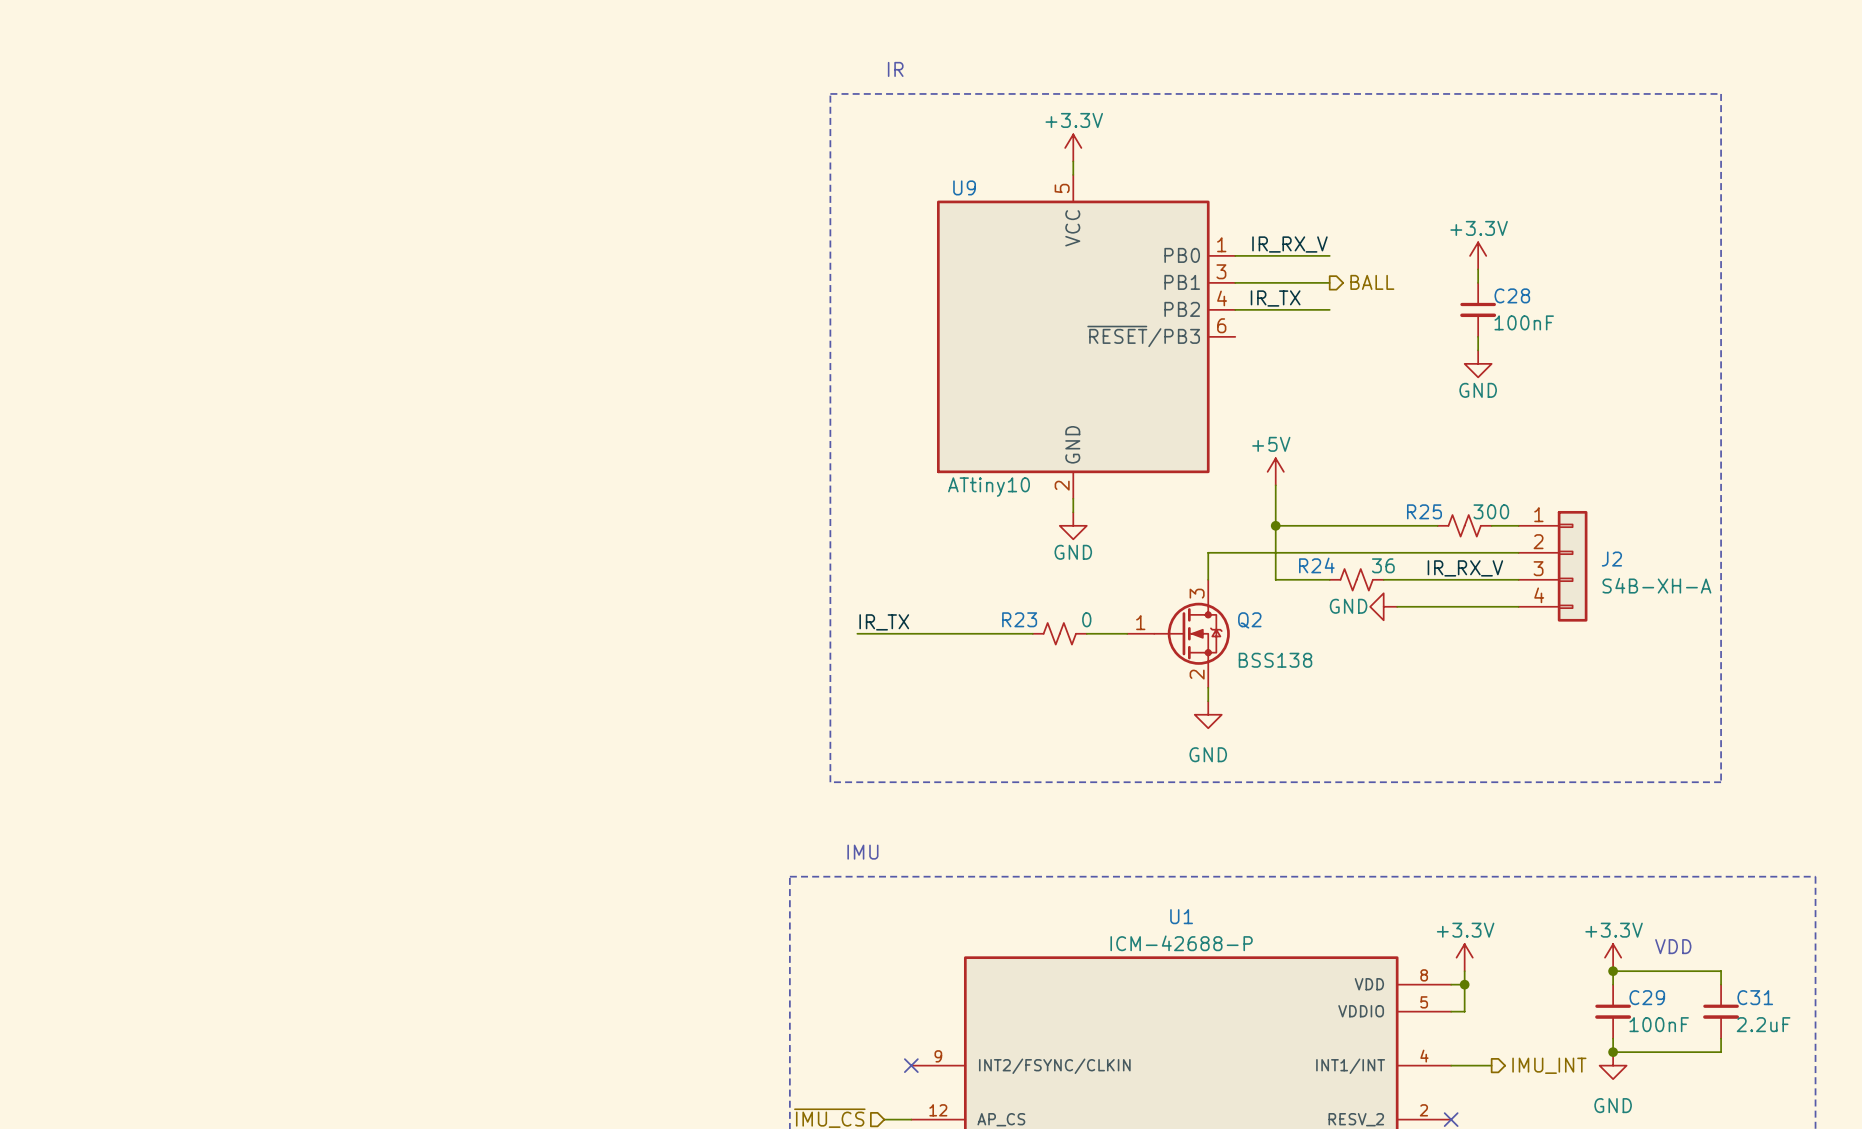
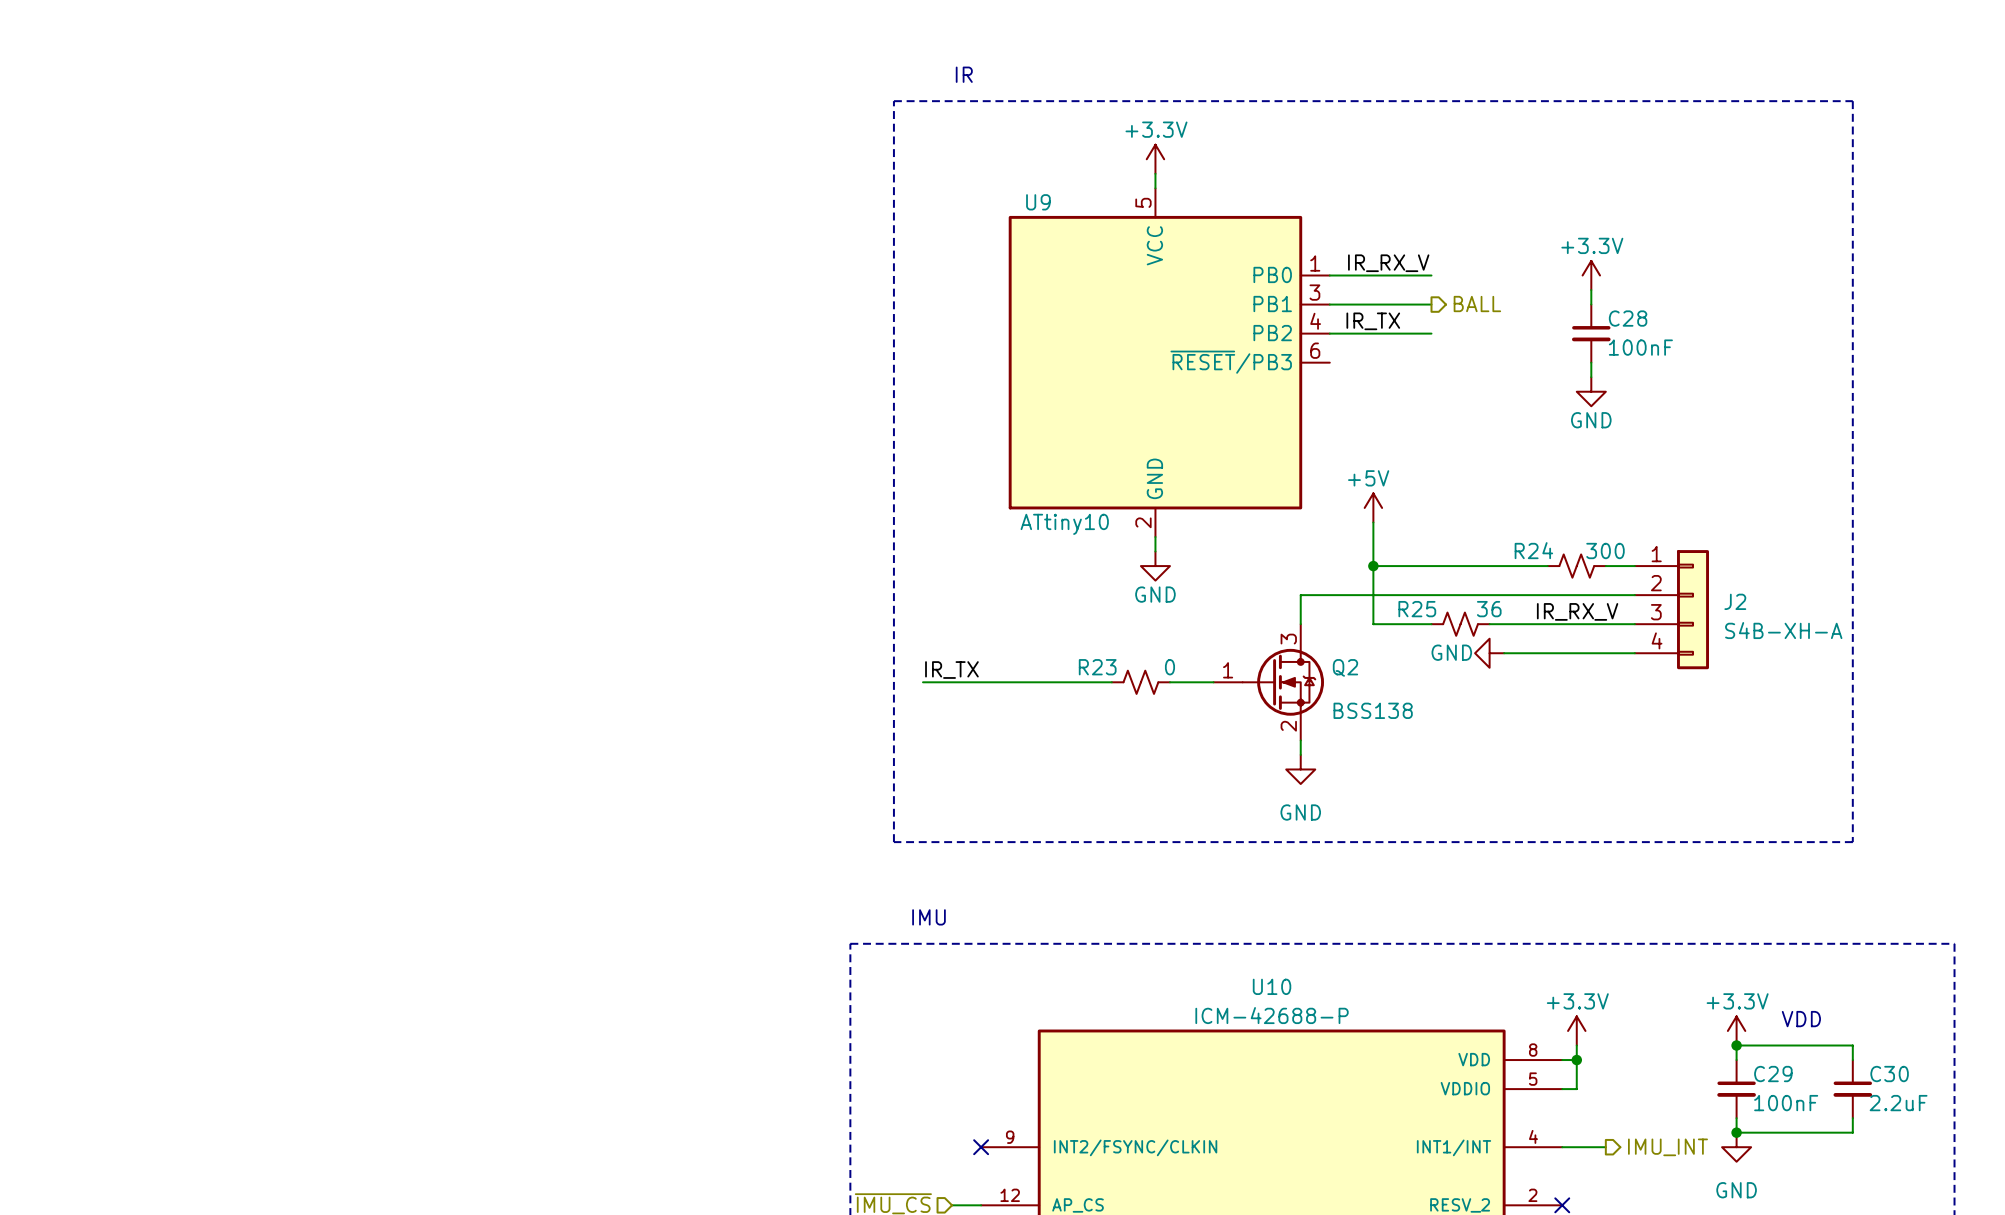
R25 name: R25 (1424, 511) -> R24 (1533, 550)
R24 name: R24 (1316, 565) -> R25 (1417, 609)
U1 name: U1 (1181, 916) -> U10 (1272, 986)
C31 name: C31 (1755, 997) -> C30 (1889, 1074)

